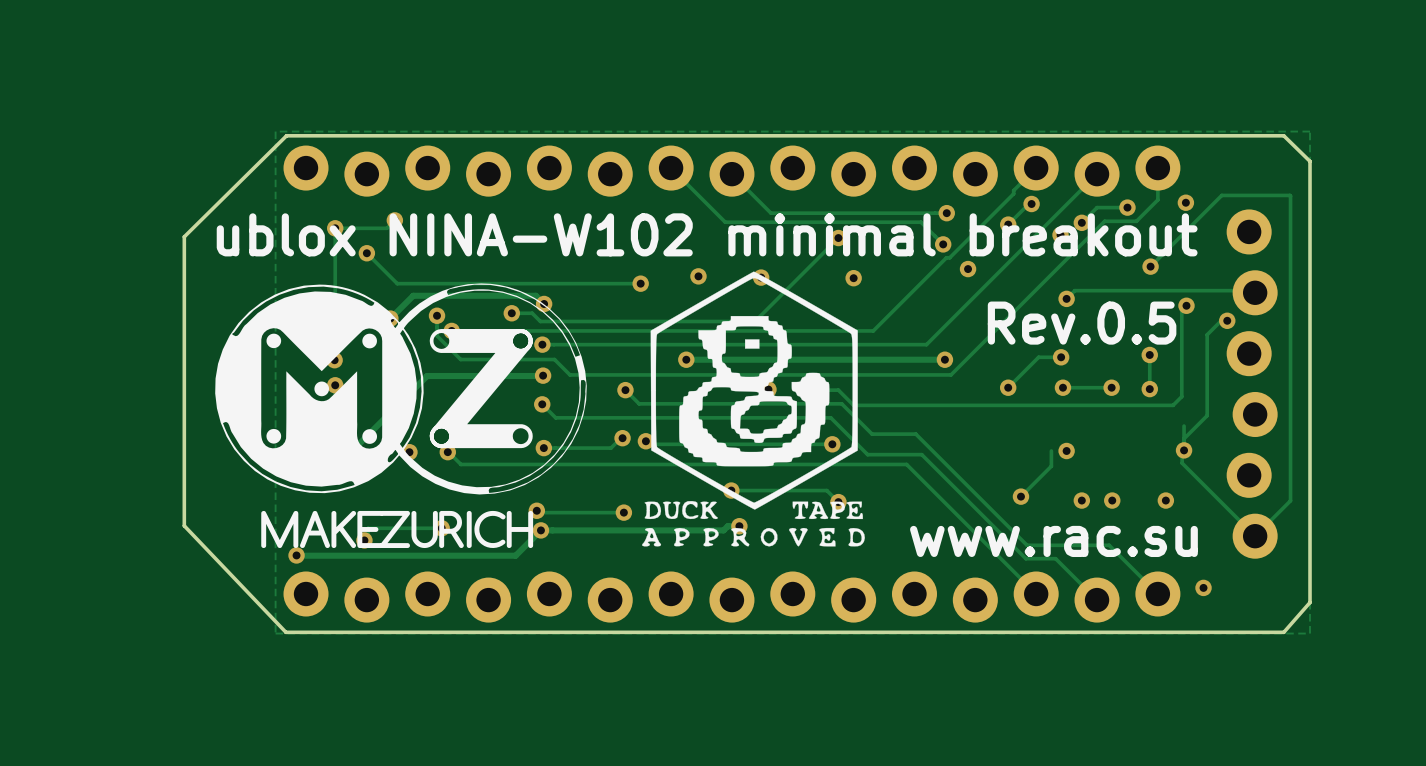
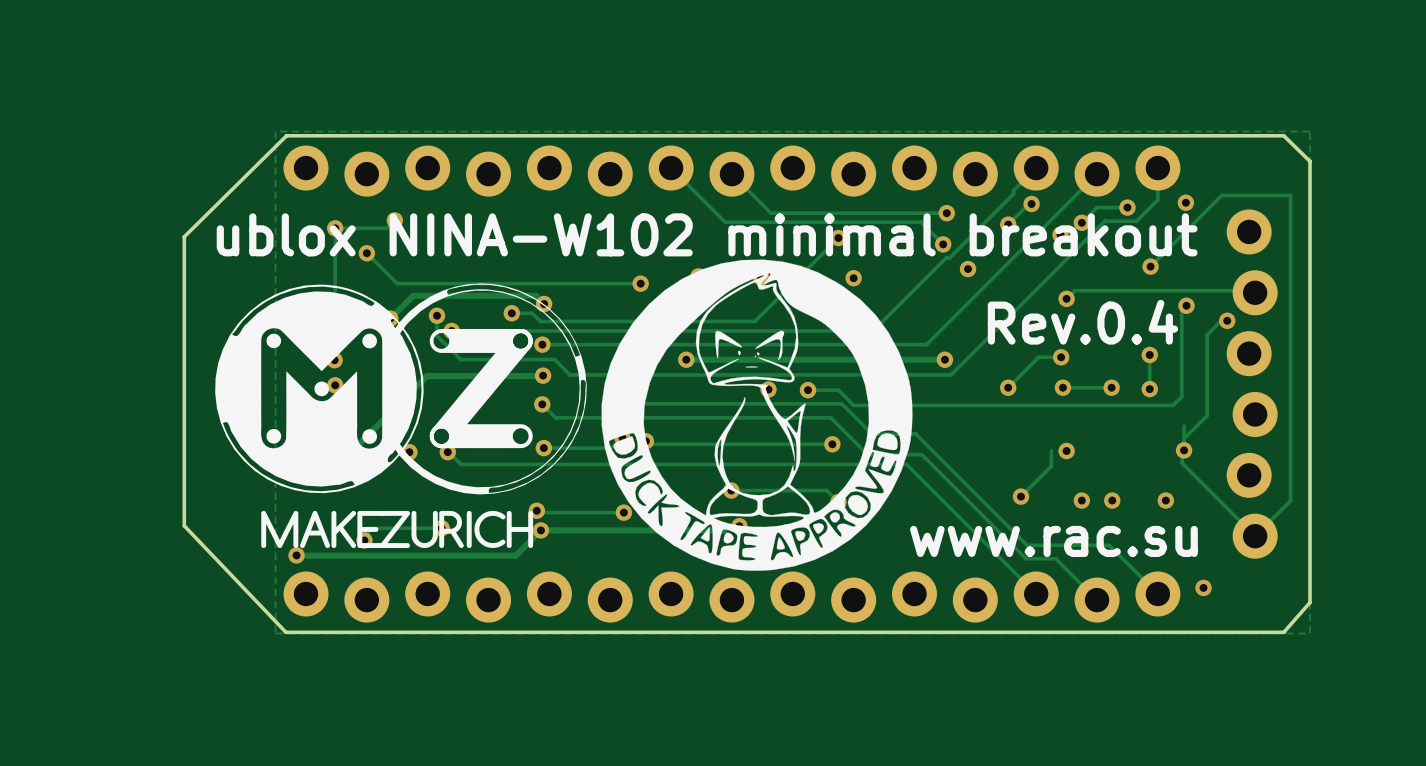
drawing shape: [642, 271, 865, 547] -> [601, 259, 913, 571]
text: Rev.0.5 (1082, 323) -> Rev.0.4 (1082, 322)

